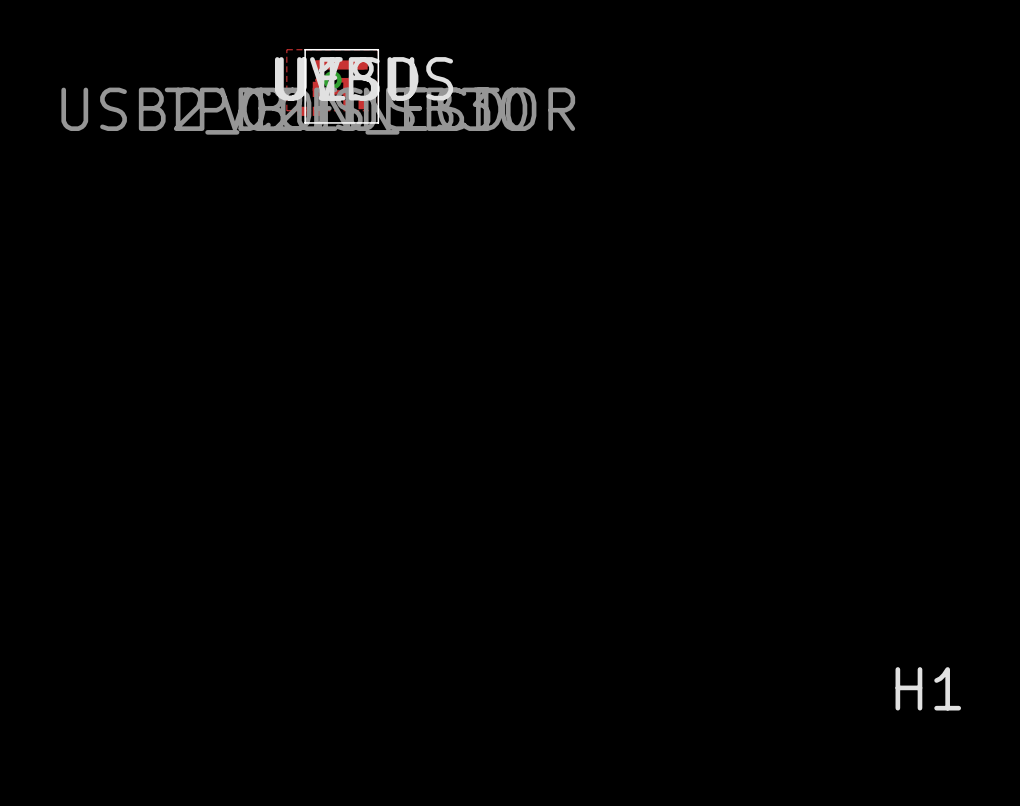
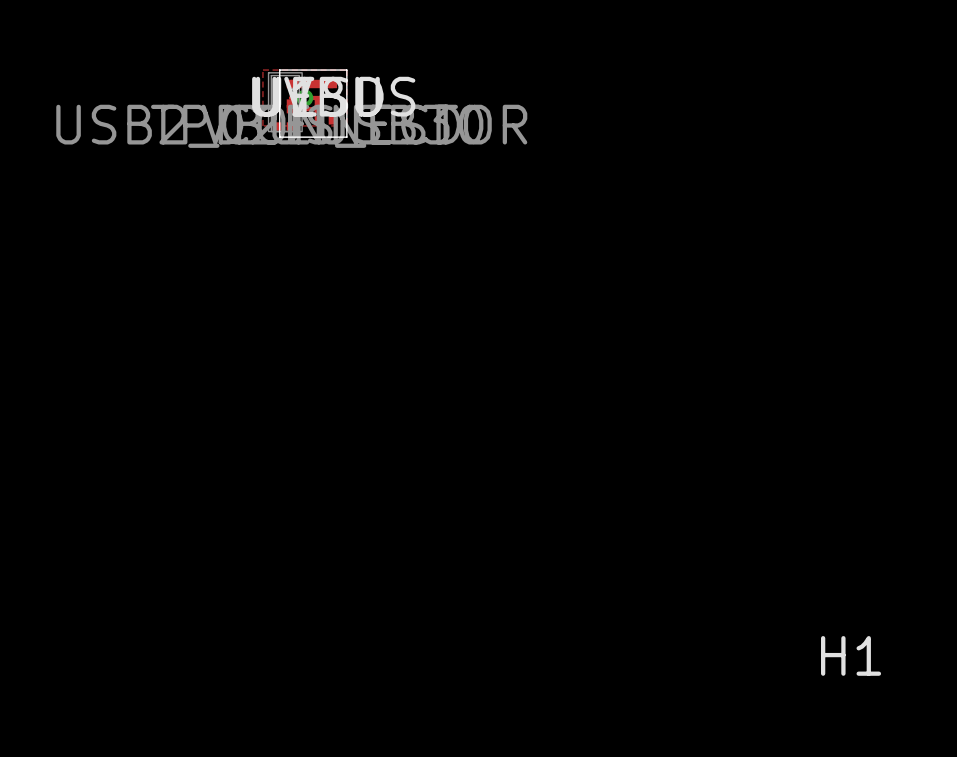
part footprint: [297, 60, 322, 116] -> [267, 72, 303, 133]

